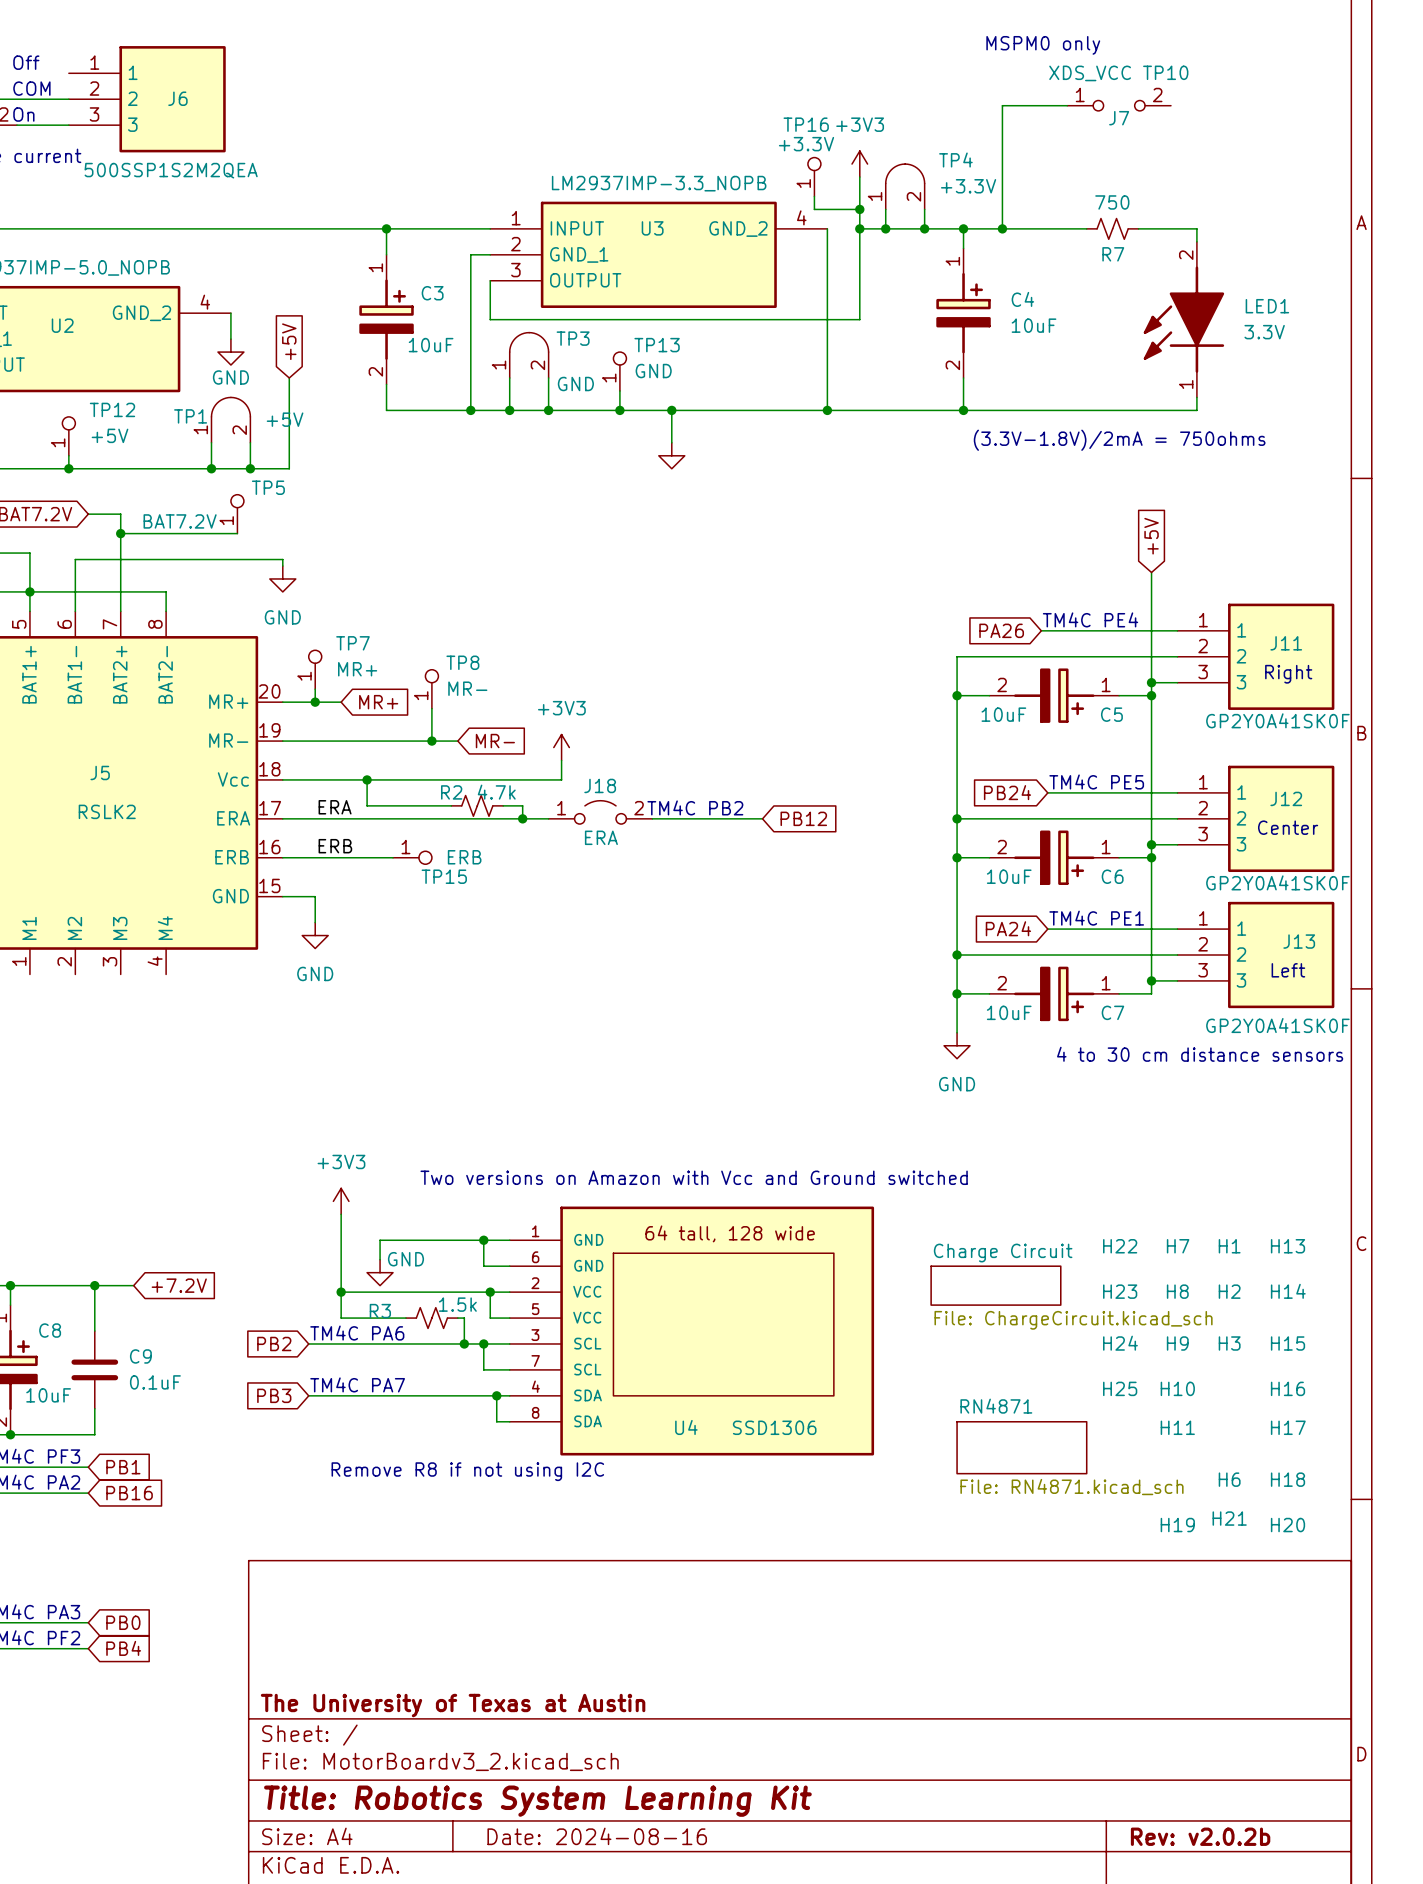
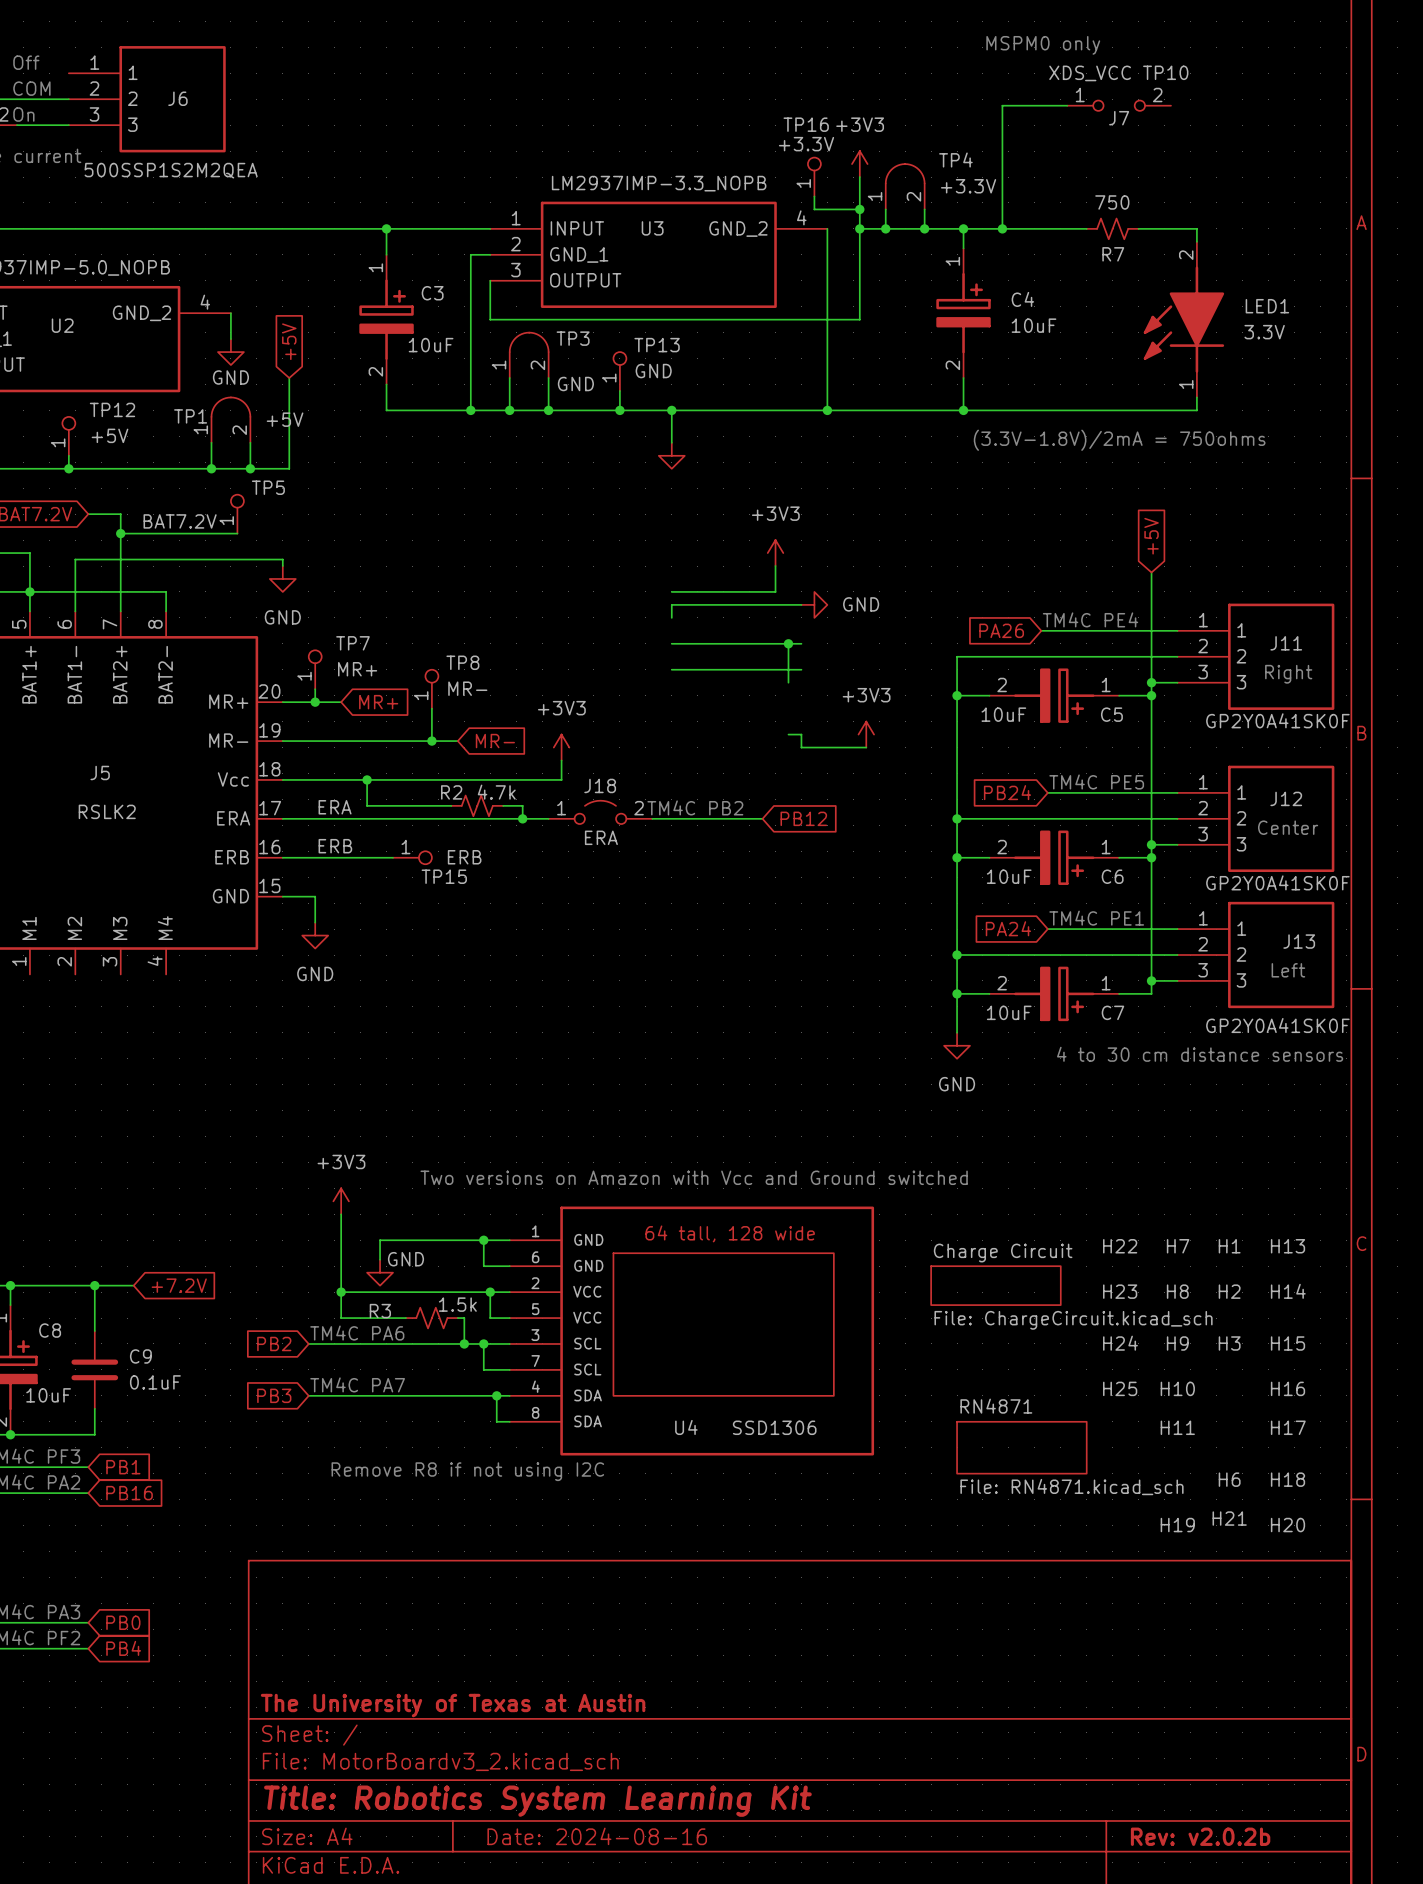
power symbol: none -> +3V3 (775, 553)
wire: none -> (775, 566) (775, 591) (671, 591)
wire: none -> (801, 604) (671, 604) (671, 617)
power symbol: none -> GND (814, 604)
wire: none -> (671, 643) (801, 643)
wire: none -> (788, 643) (788, 682)
junction: none -> (788, 643)
wire: none -> (671, 669) (801, 669)
wire: none -> (788, 734) (801, 734) (801, 747) (866, 747)
power symbol: none -> +3V3 (866, 734)

